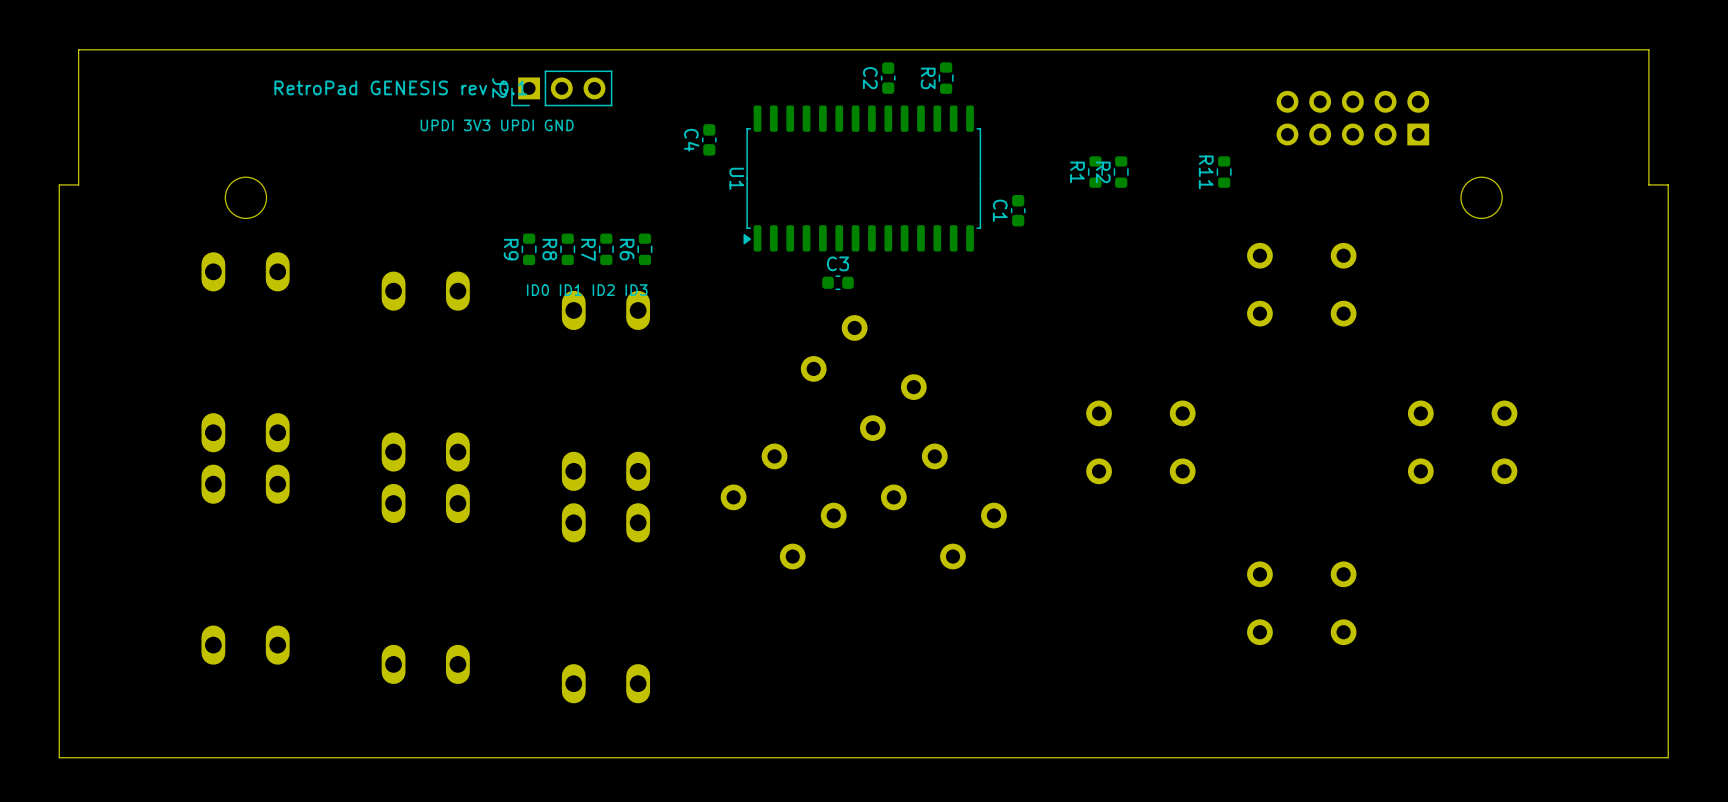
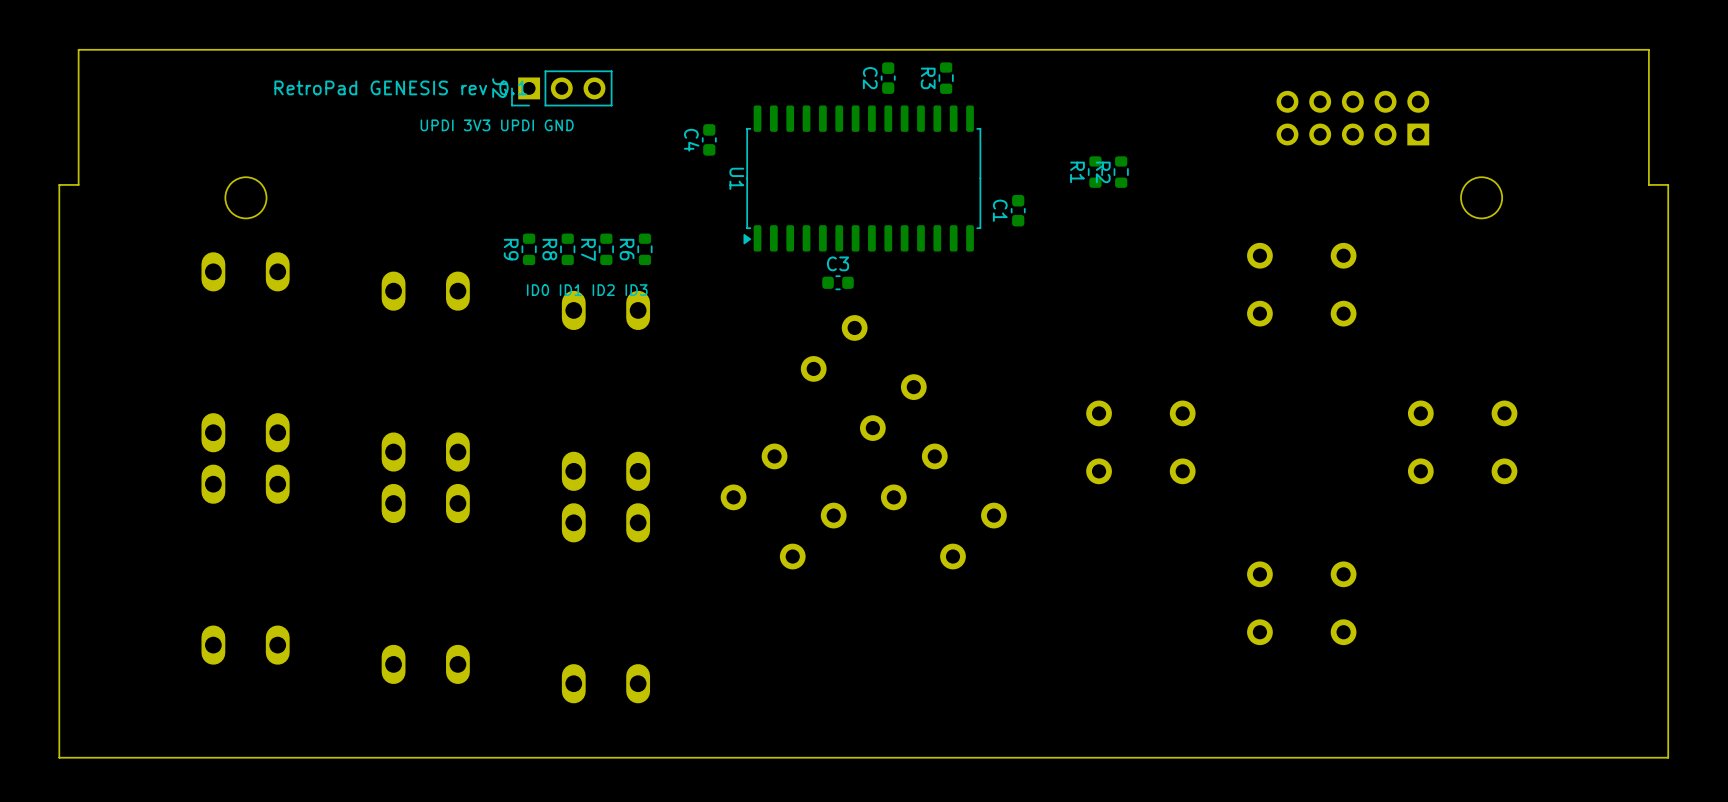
R11: (1224, 172) -> none

